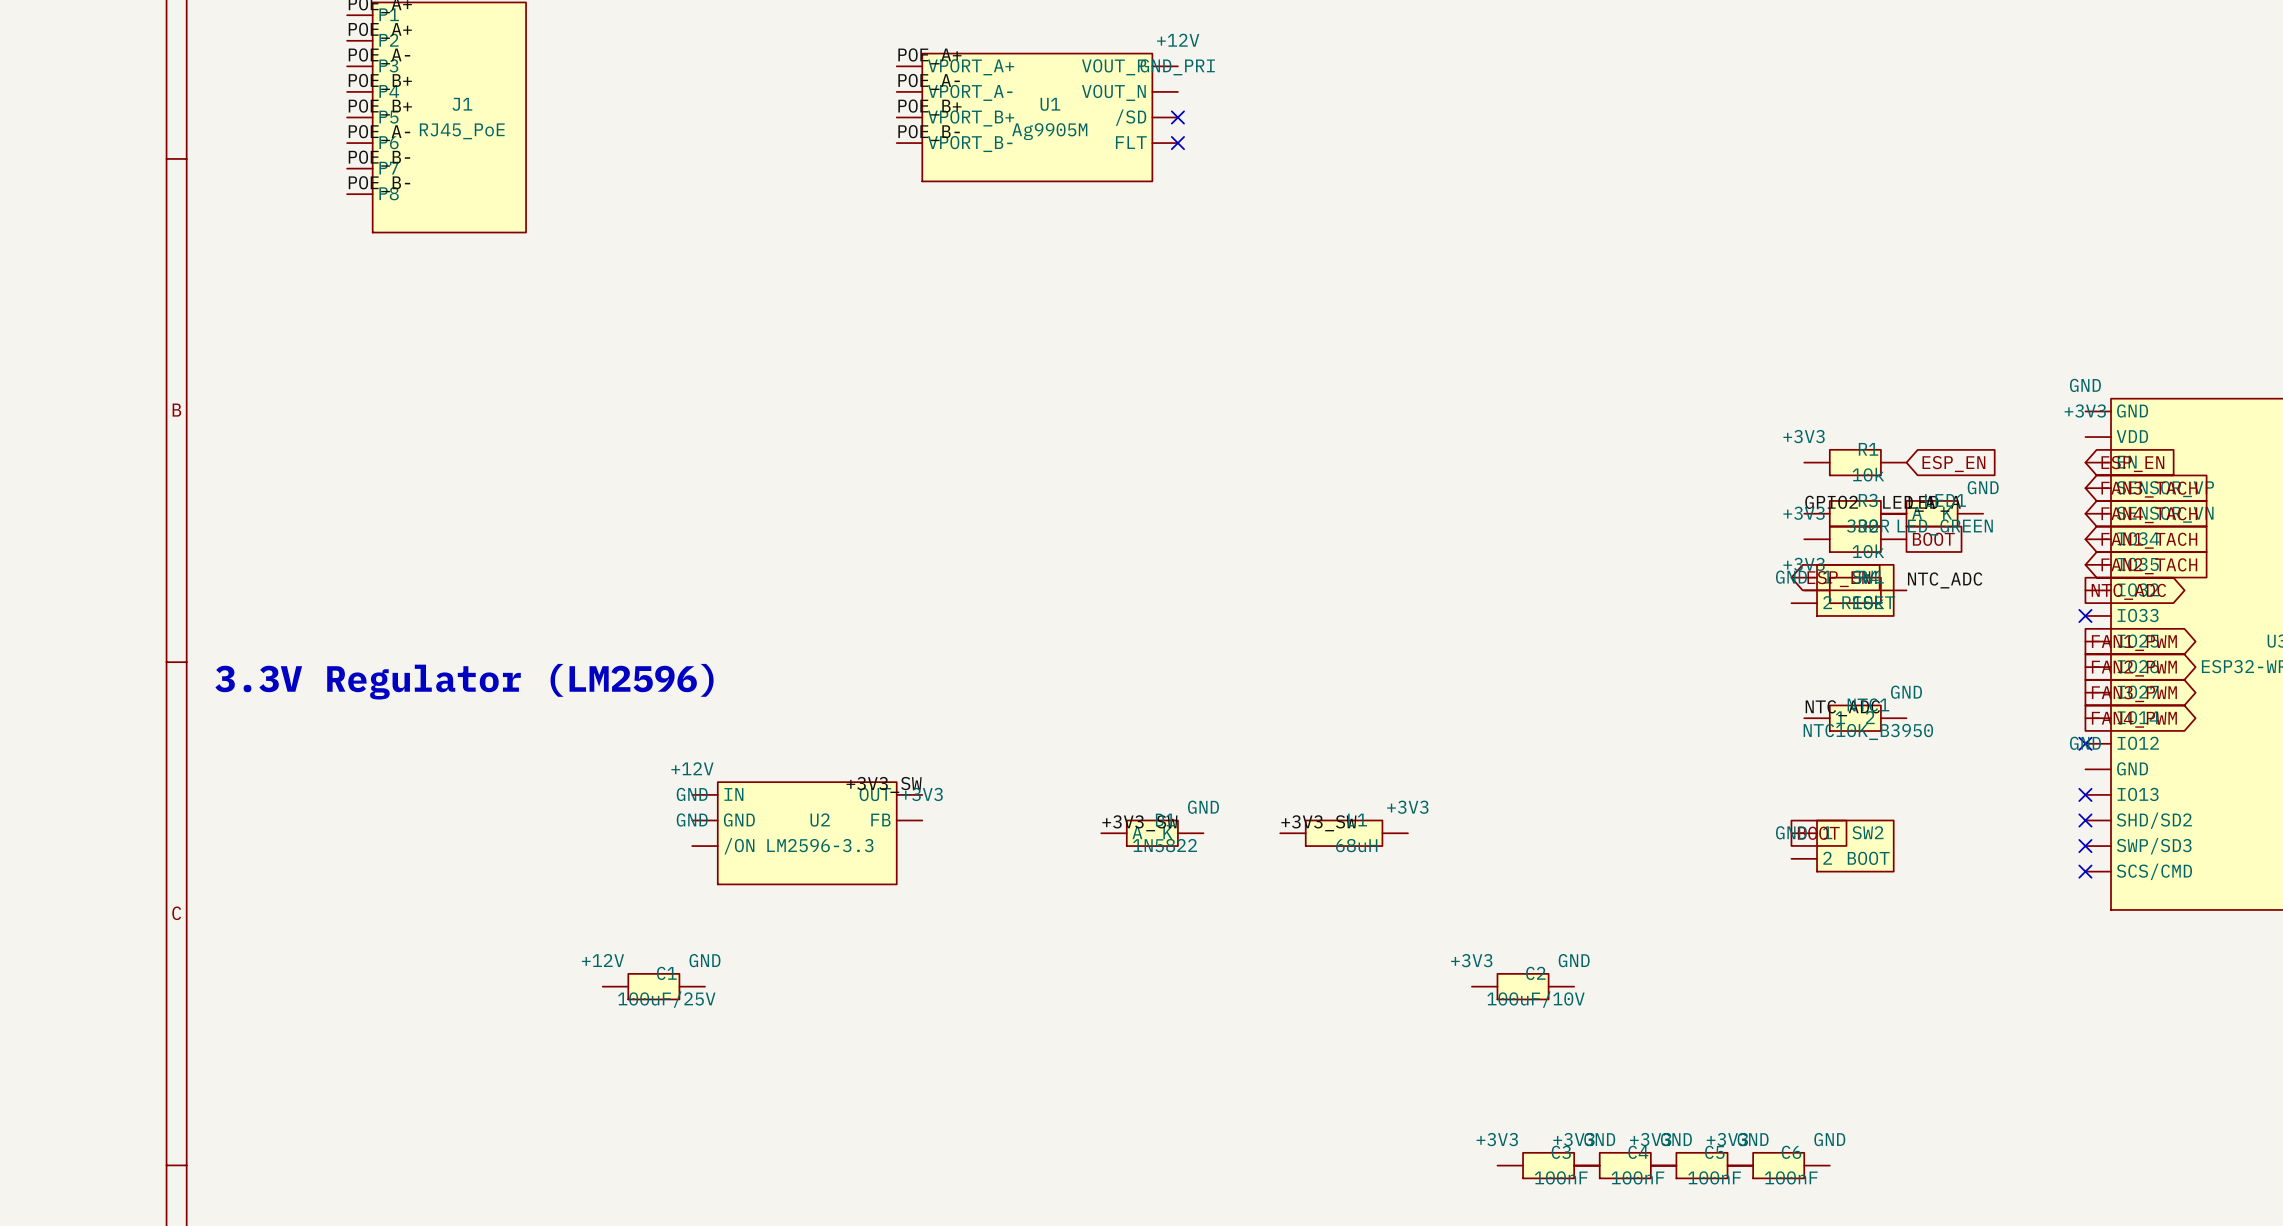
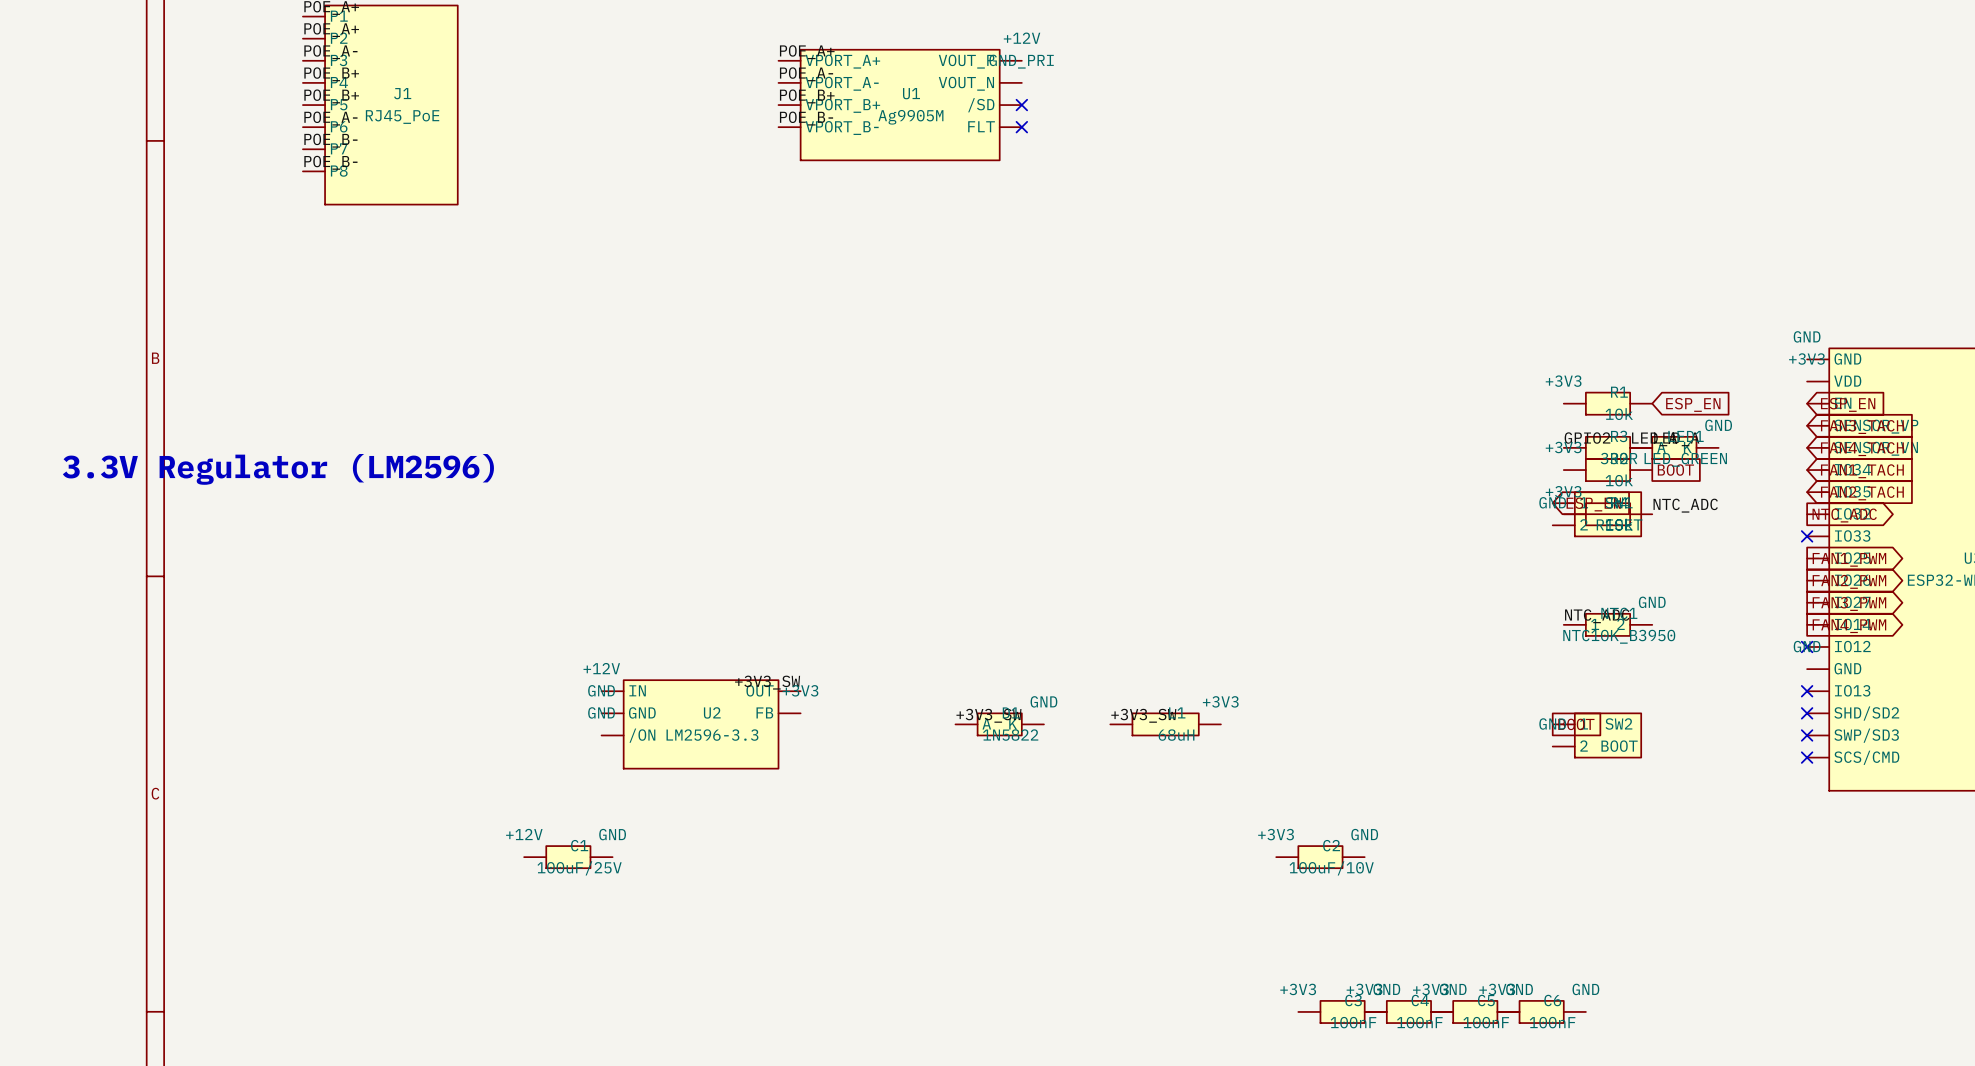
text position: 3.3V Regulator (LM2596) (464, 681) -> 3.3V Regulator (LM2596) (278, 469)

